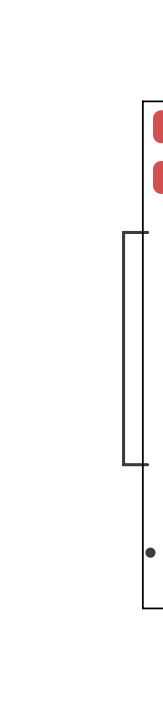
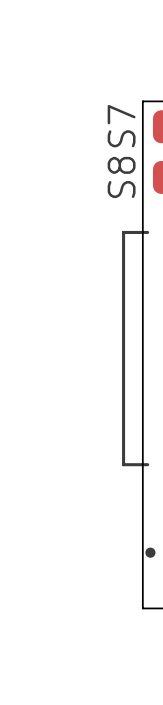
S7 name: none -> S7 (121, 126)
S8 name: none -> S8 (121, 177)

